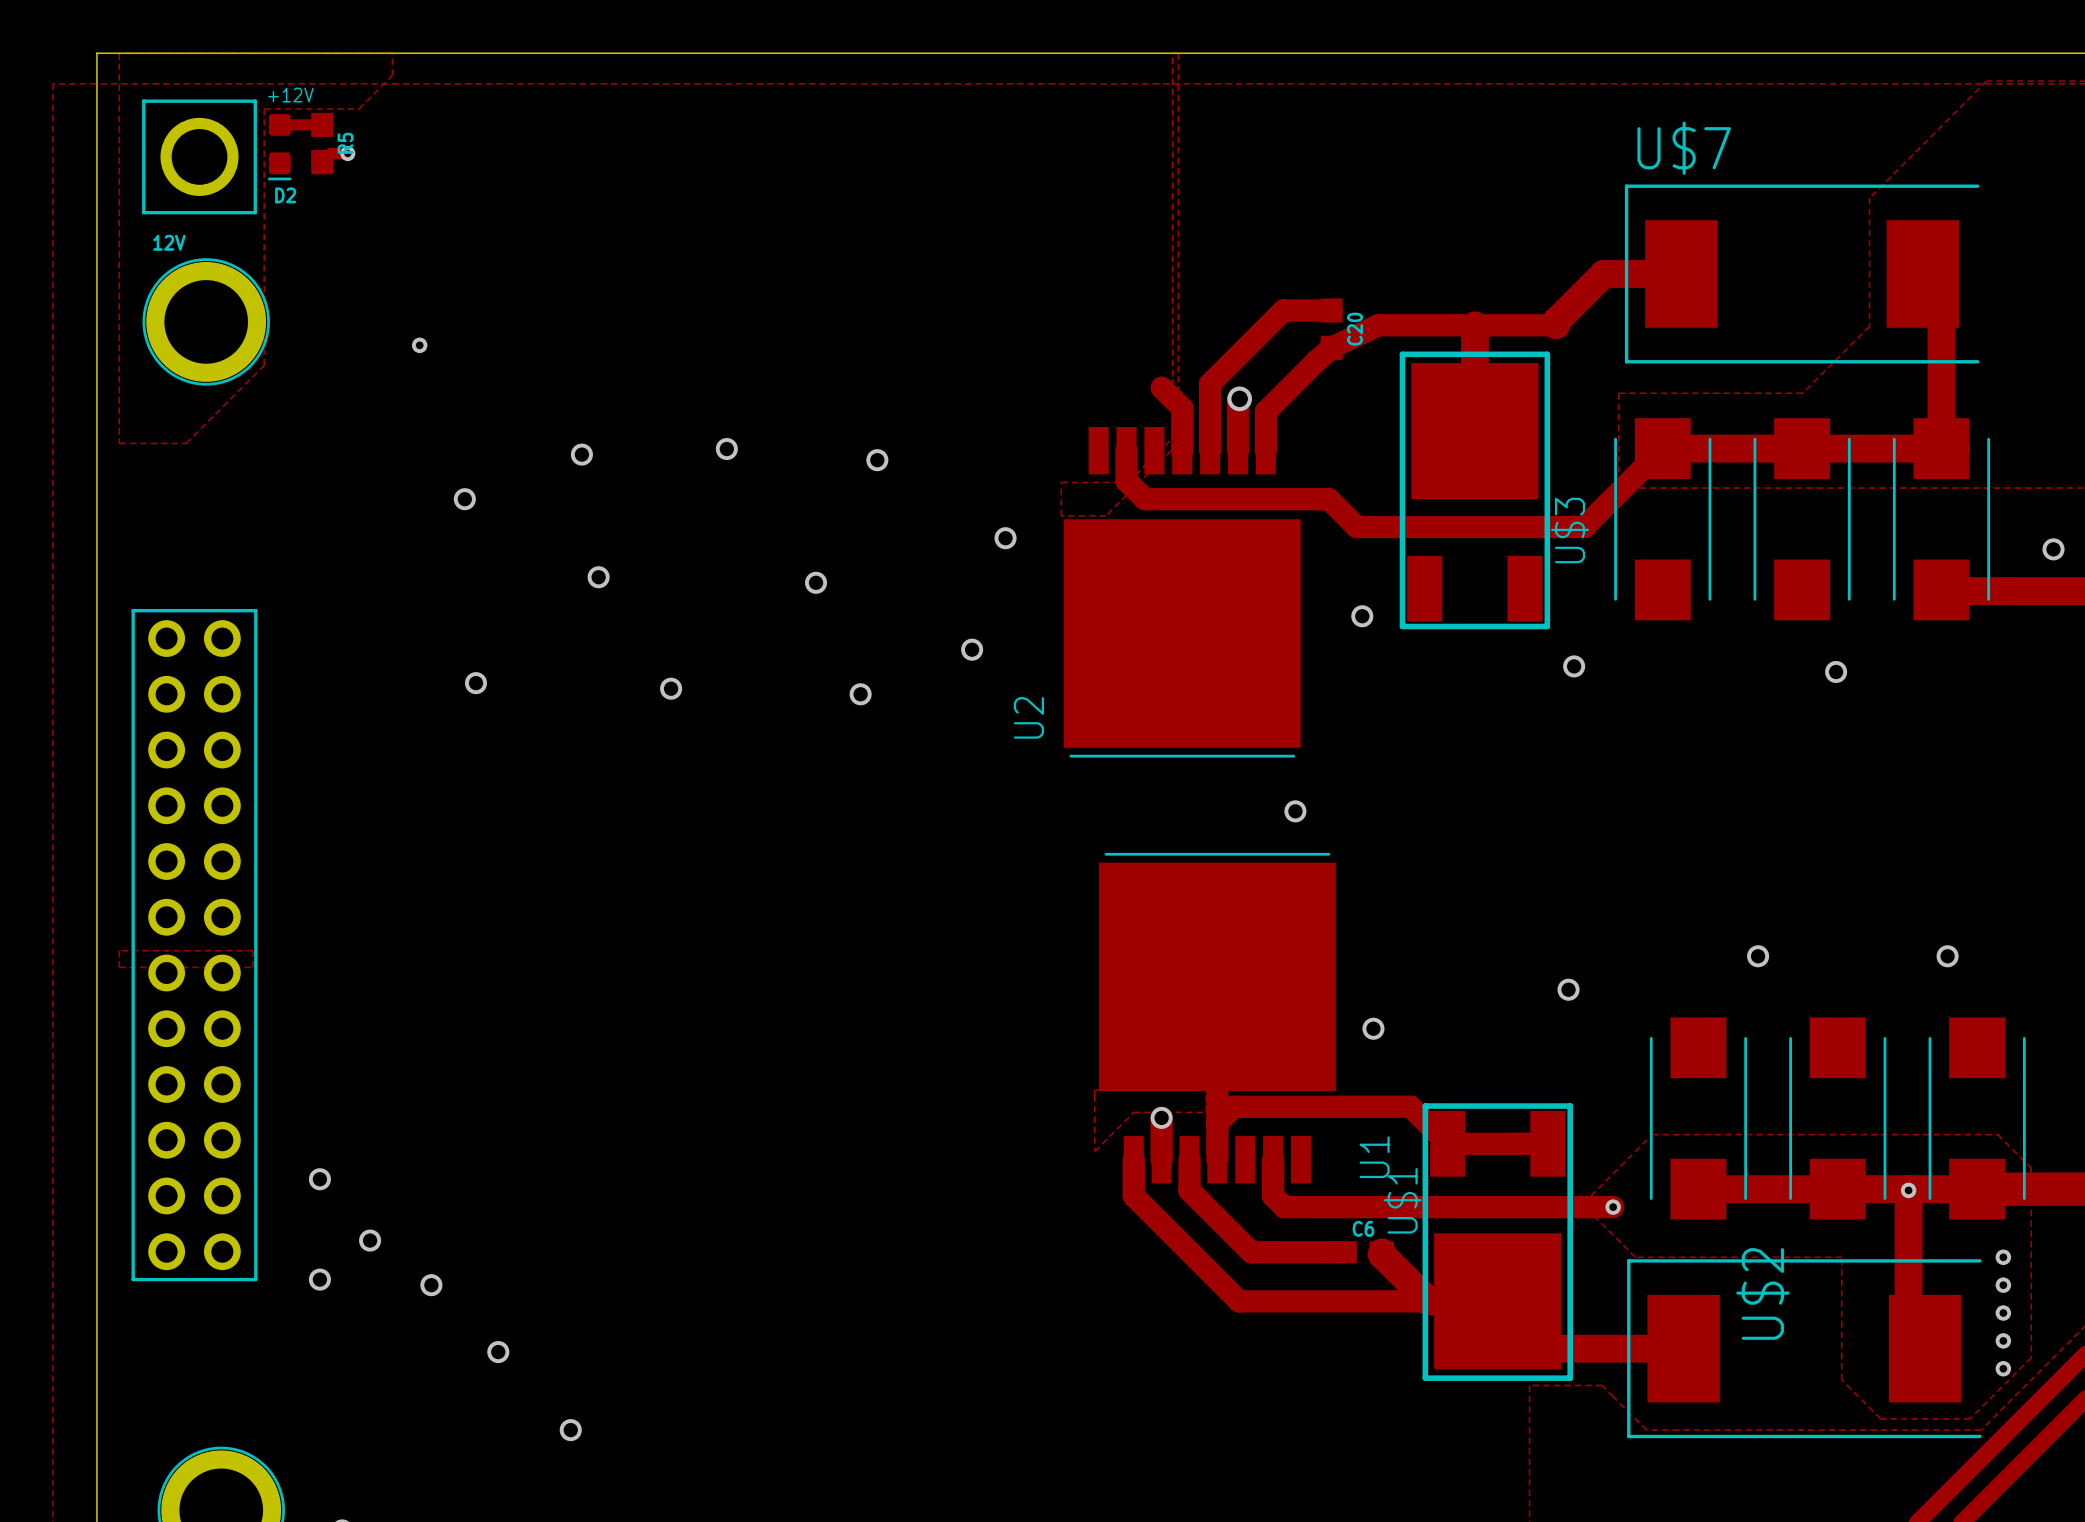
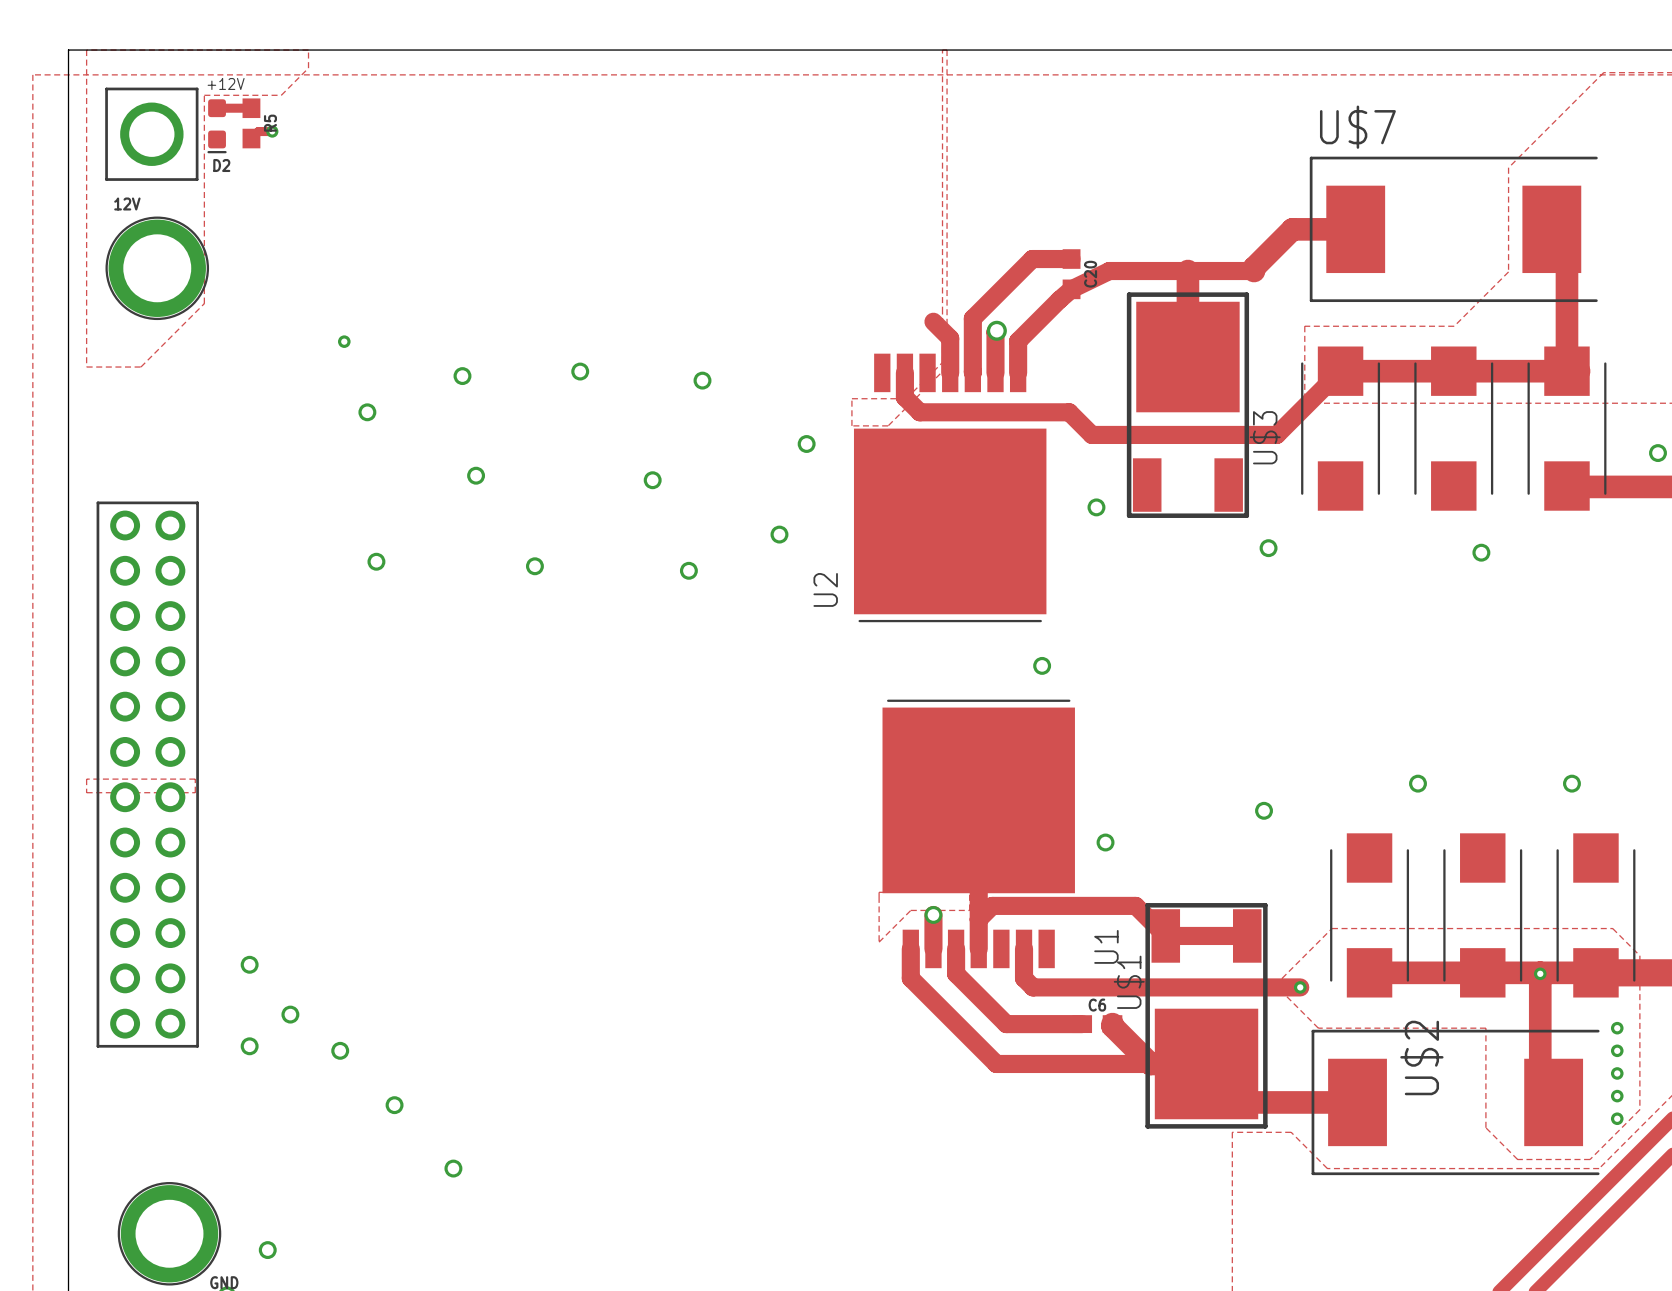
via position: (419, 345) -> (344, 341)

